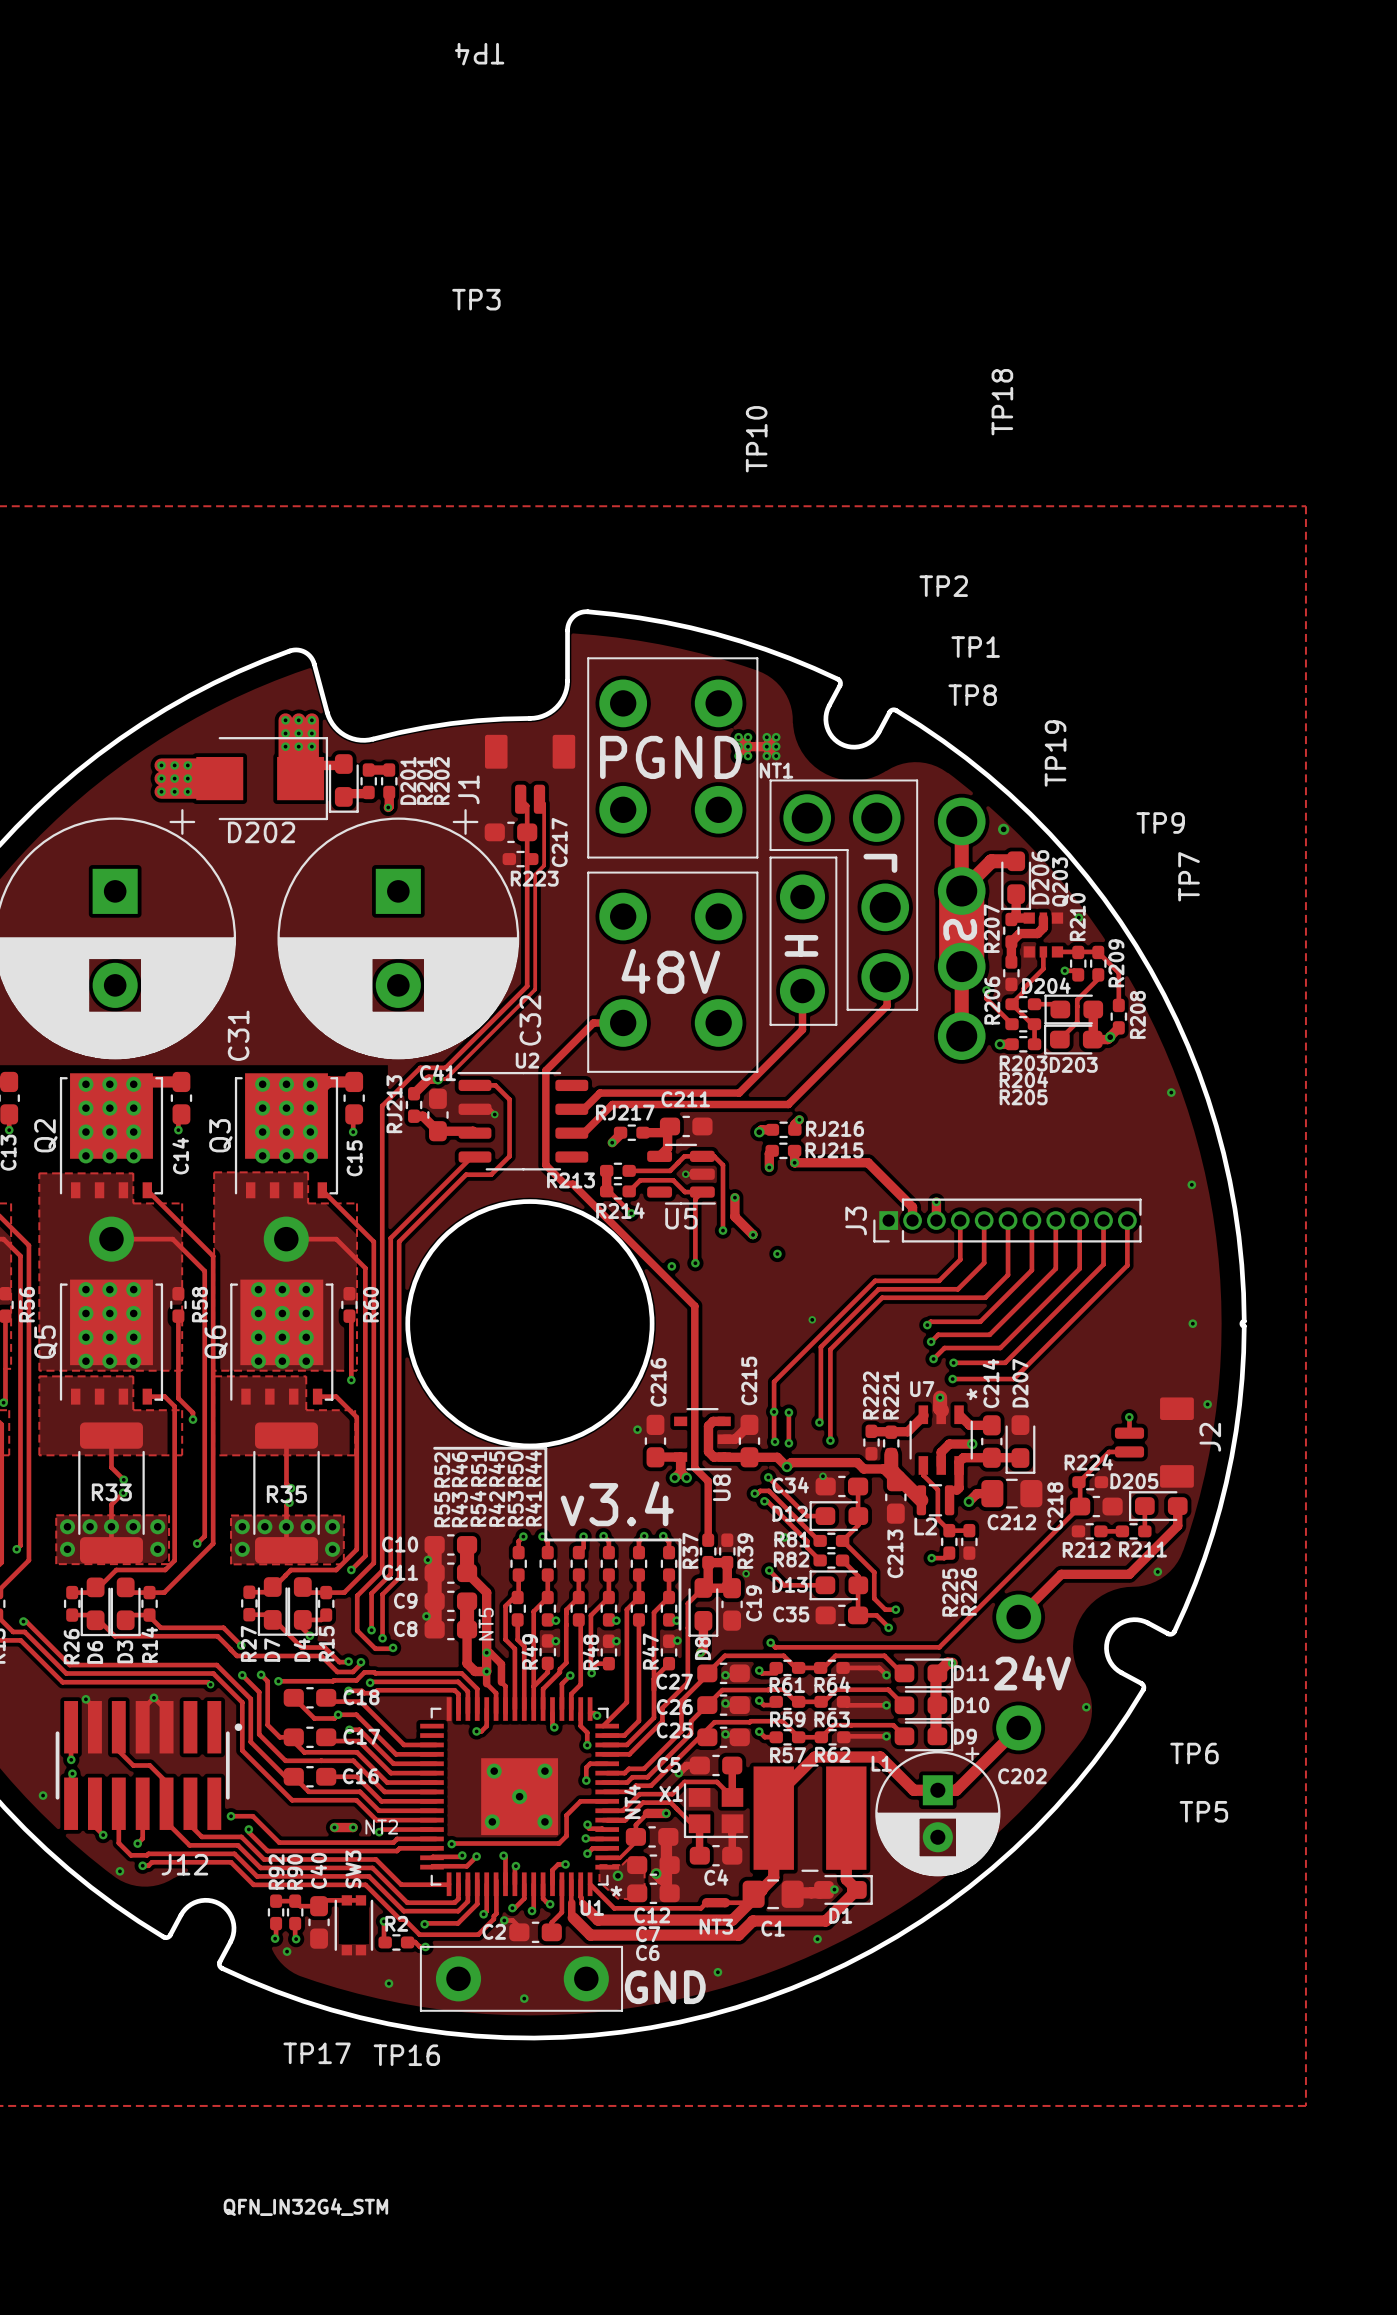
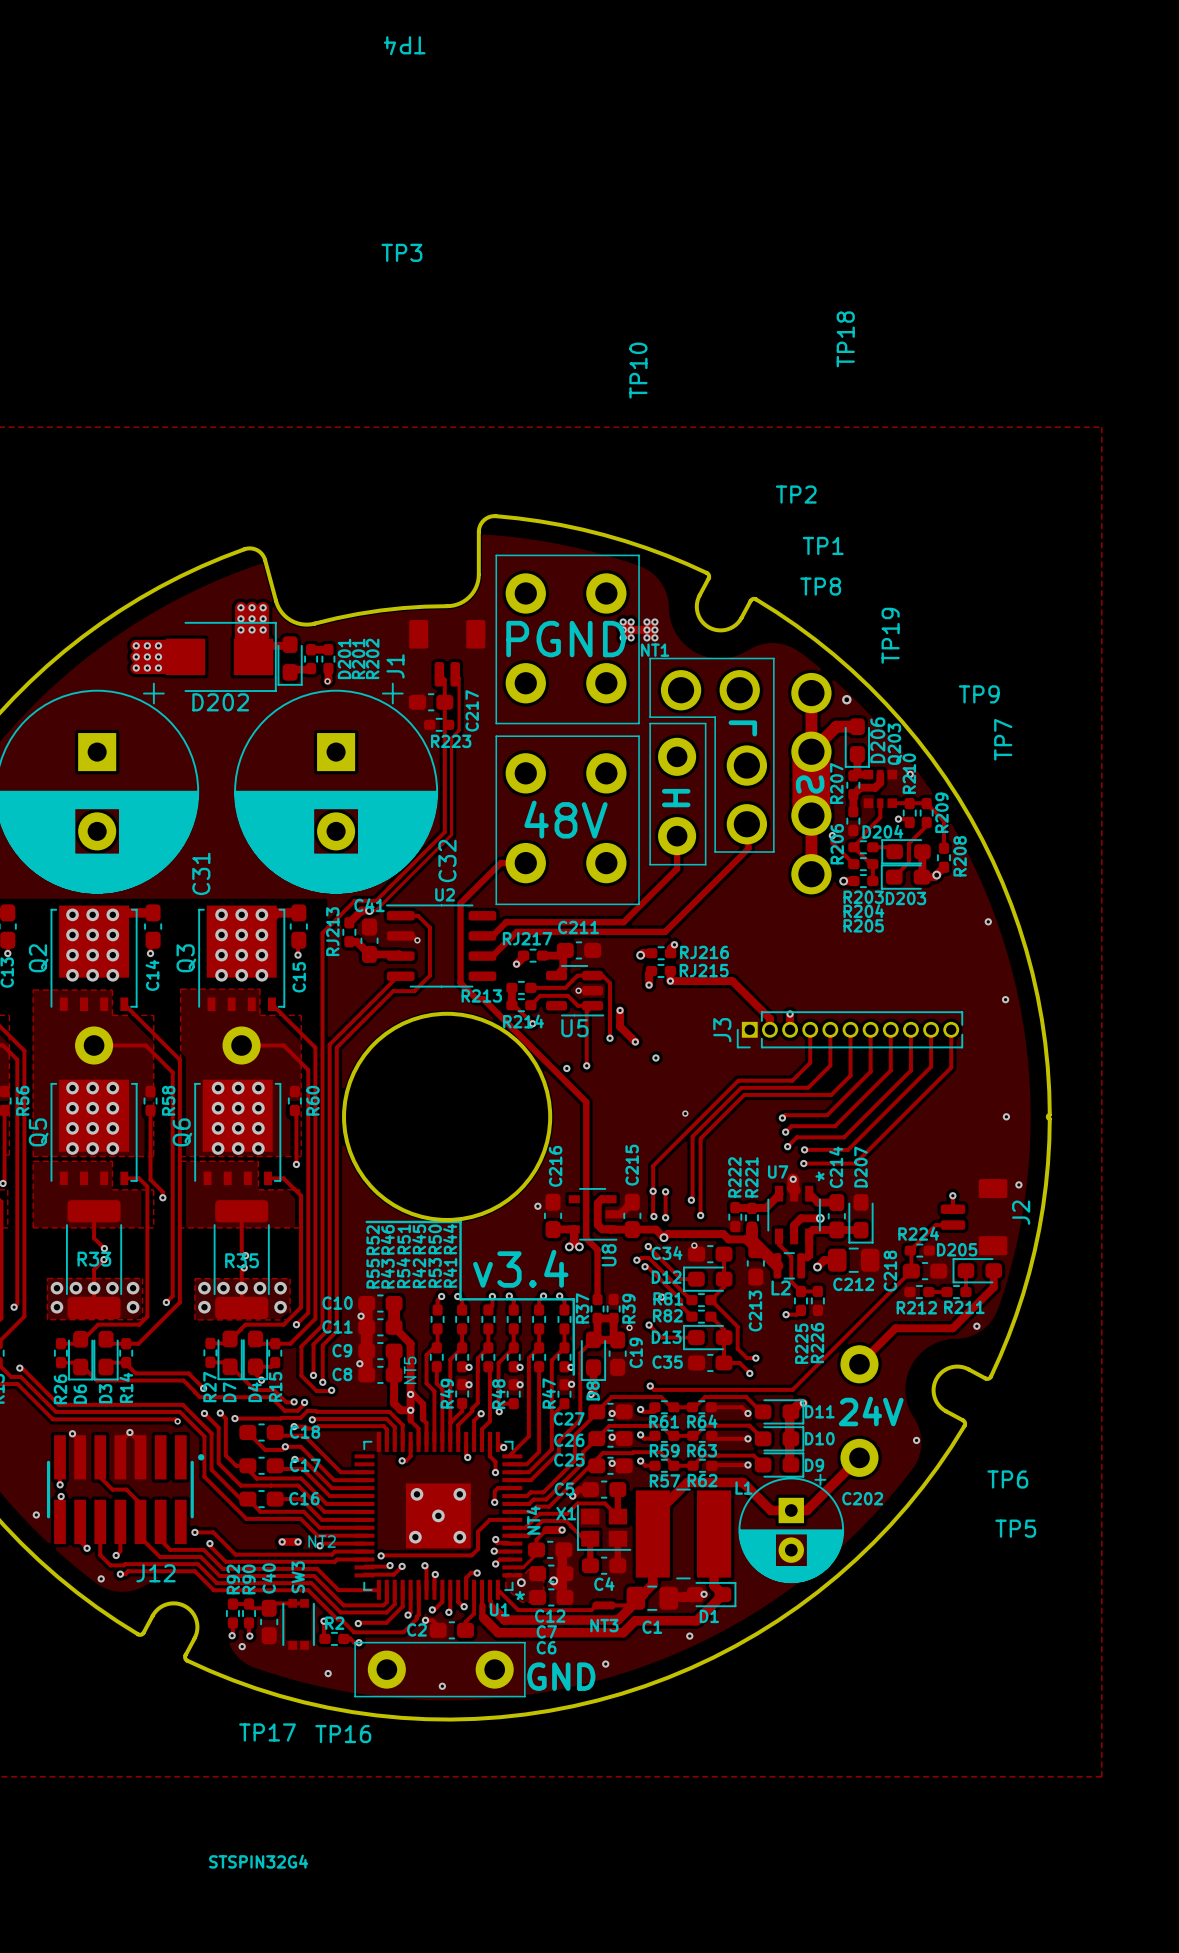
U1 value: QFN_IN32G4_STM (305, 2207) -> STSPIN32G4 (258, 1861)

